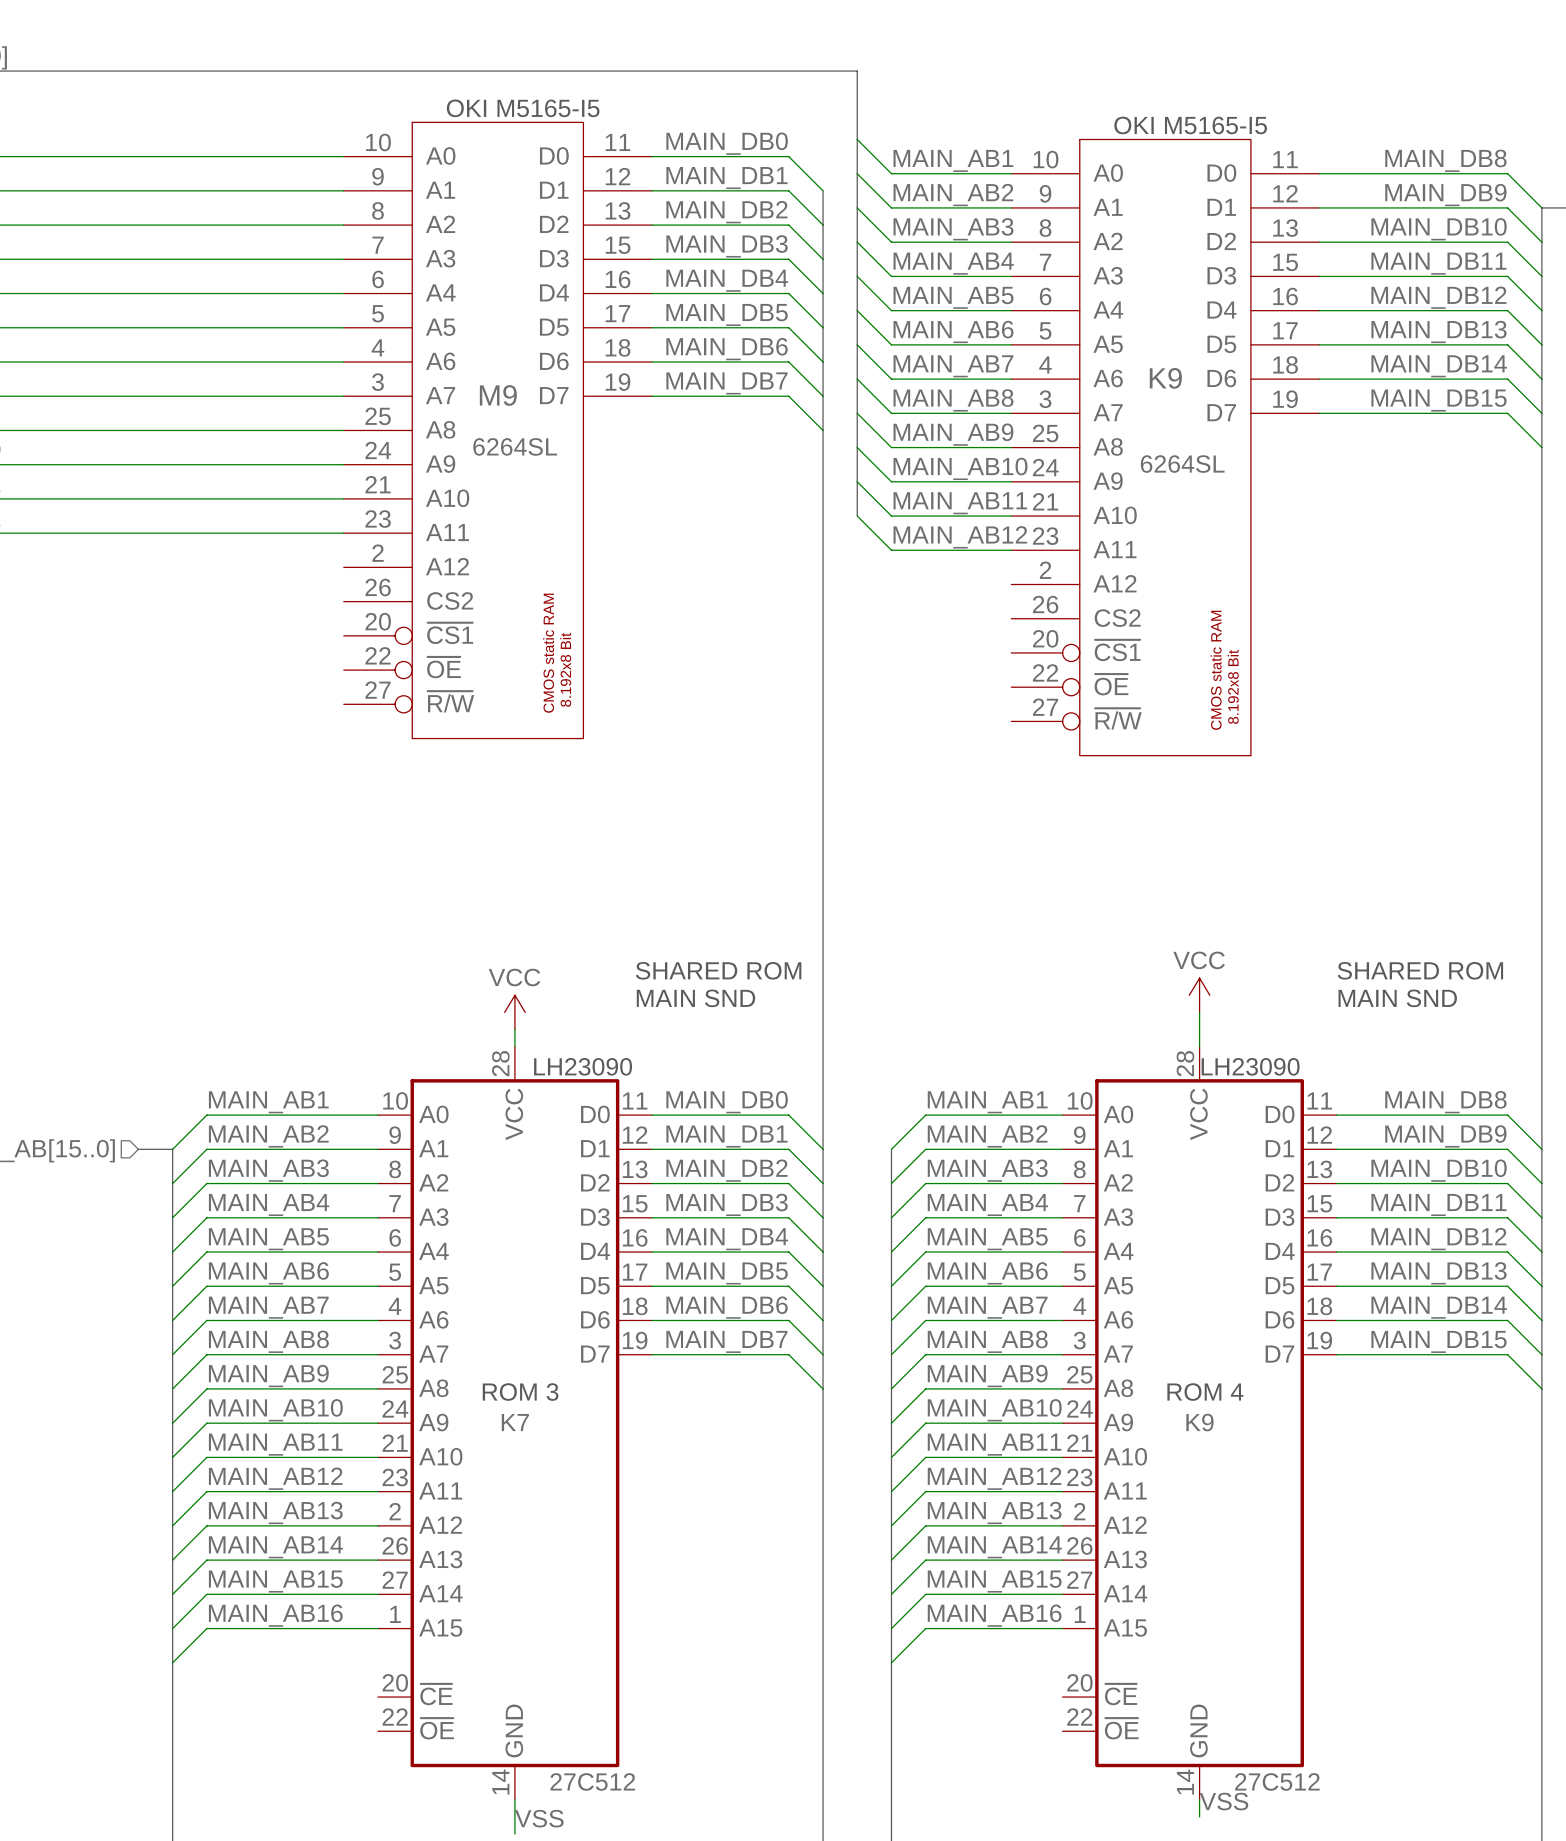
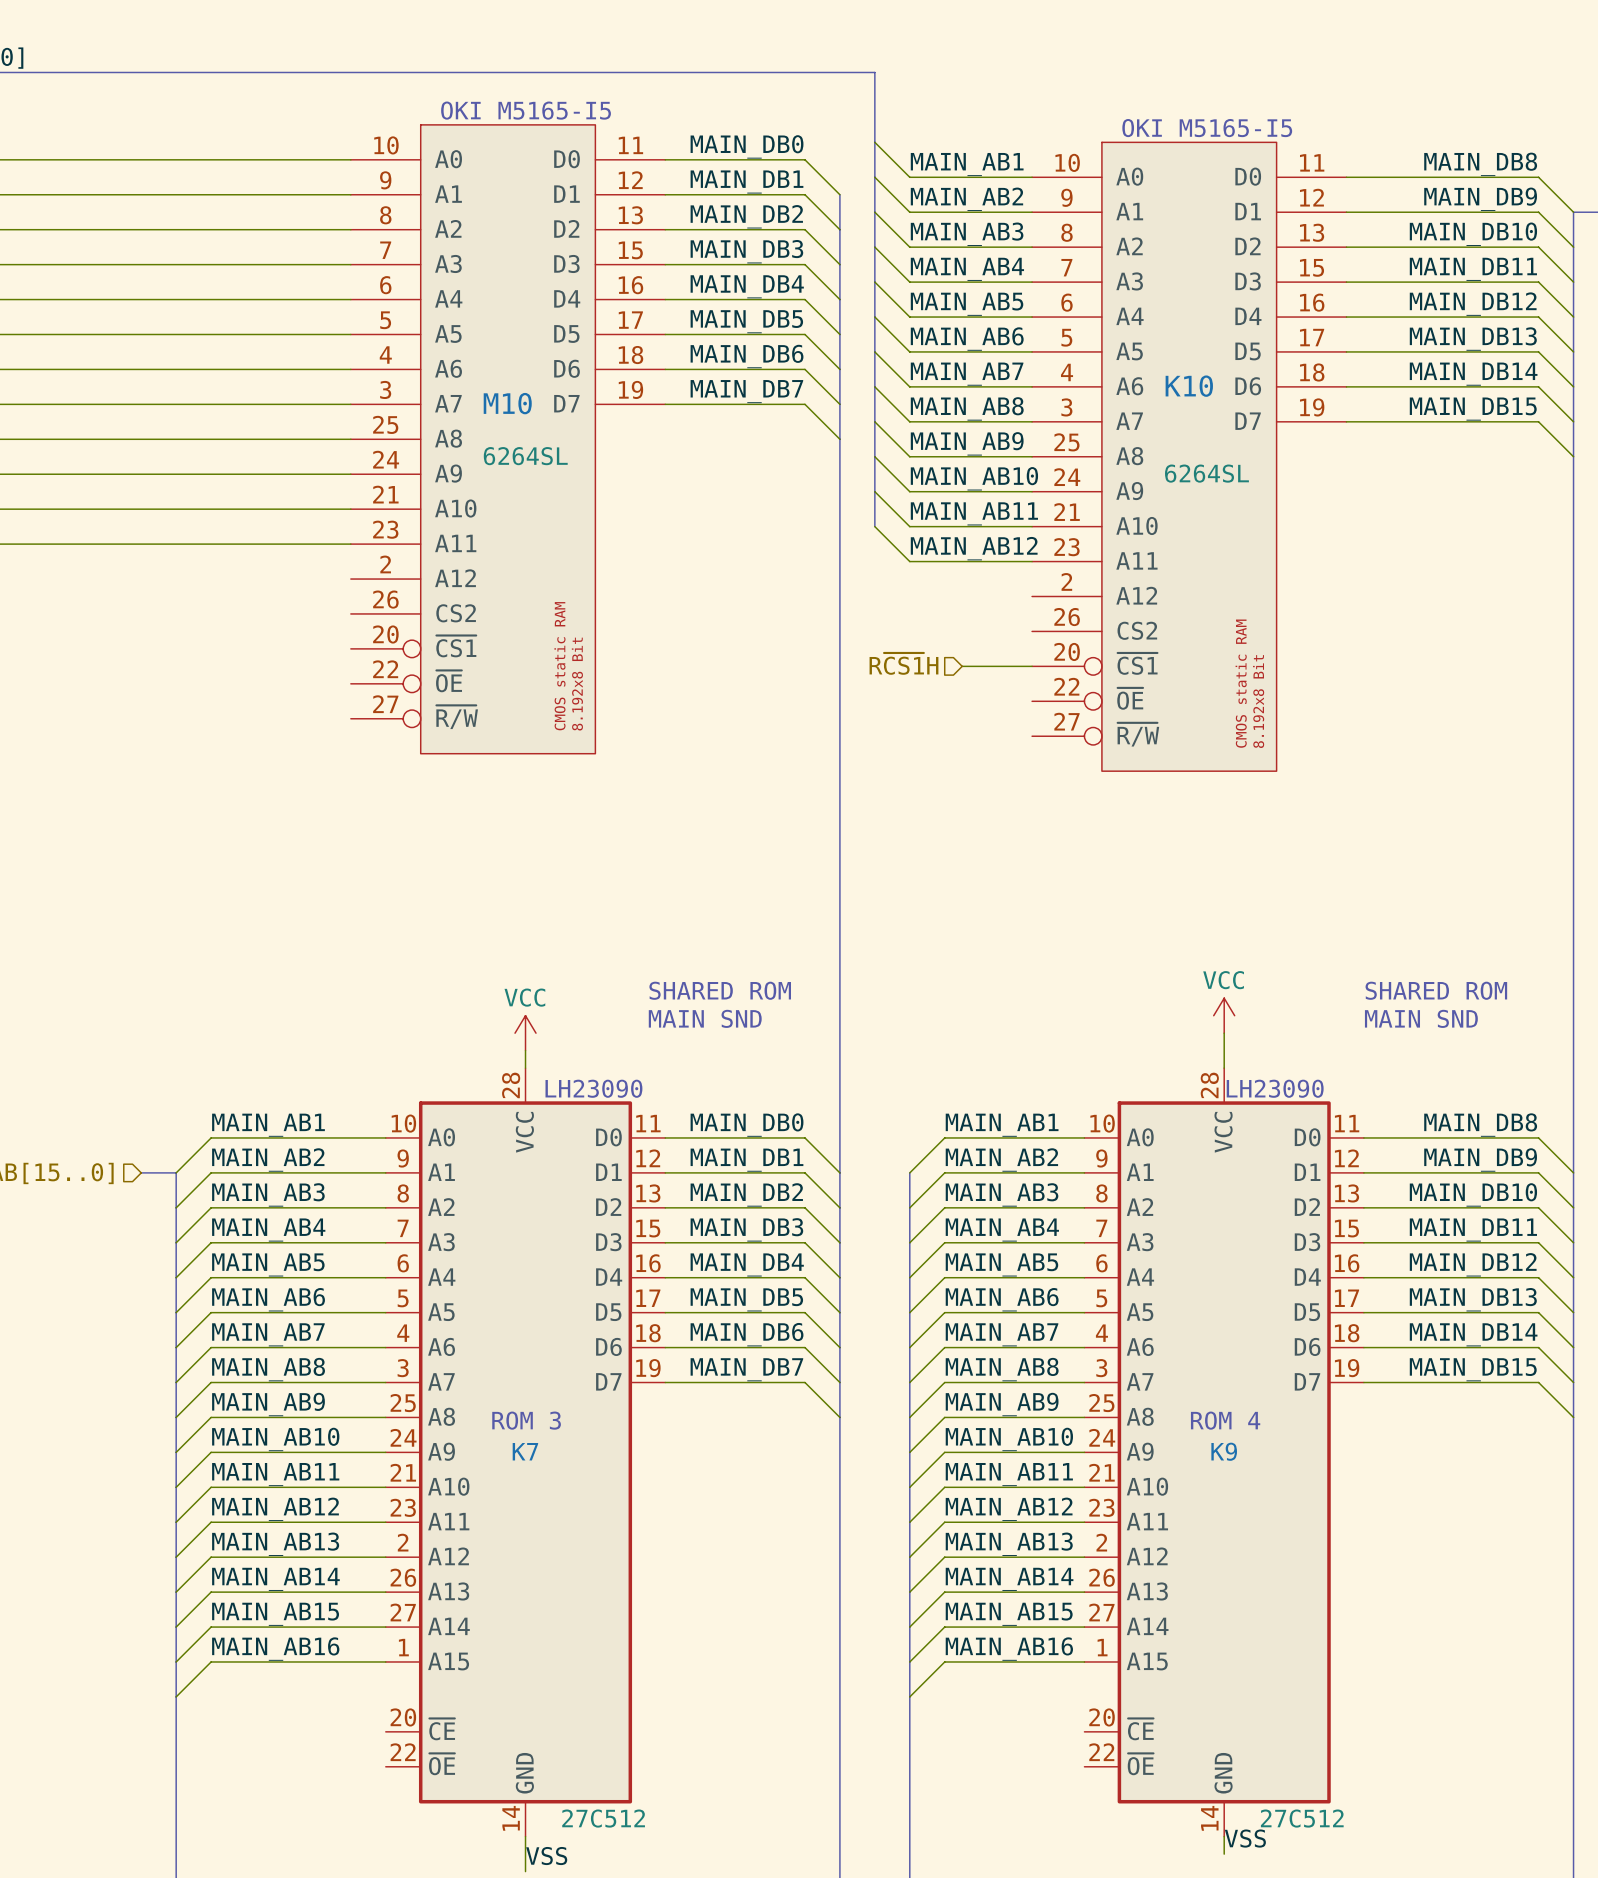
K9 name: K9 (1165, 378) -> K10 (1189, 386)
M9 name: M9 (498, 395) -> M10 (507, 403)
hierarchical label: none -> R~{CS1}H (903, 663)
wire: none -> (962, 666) (1032, 666)

